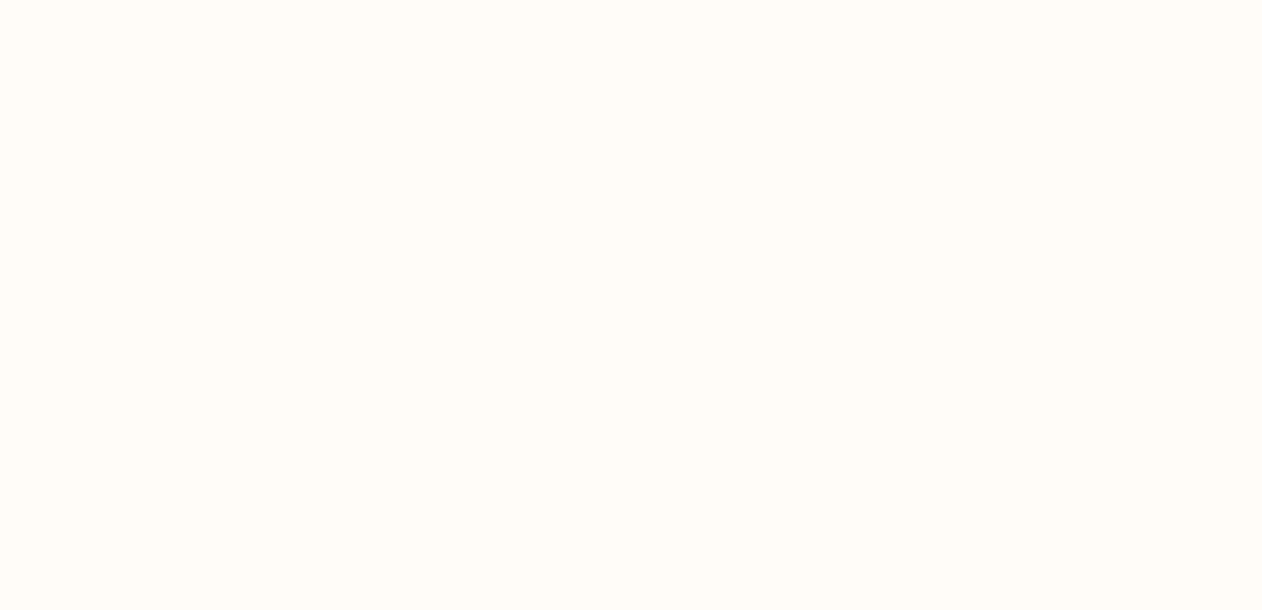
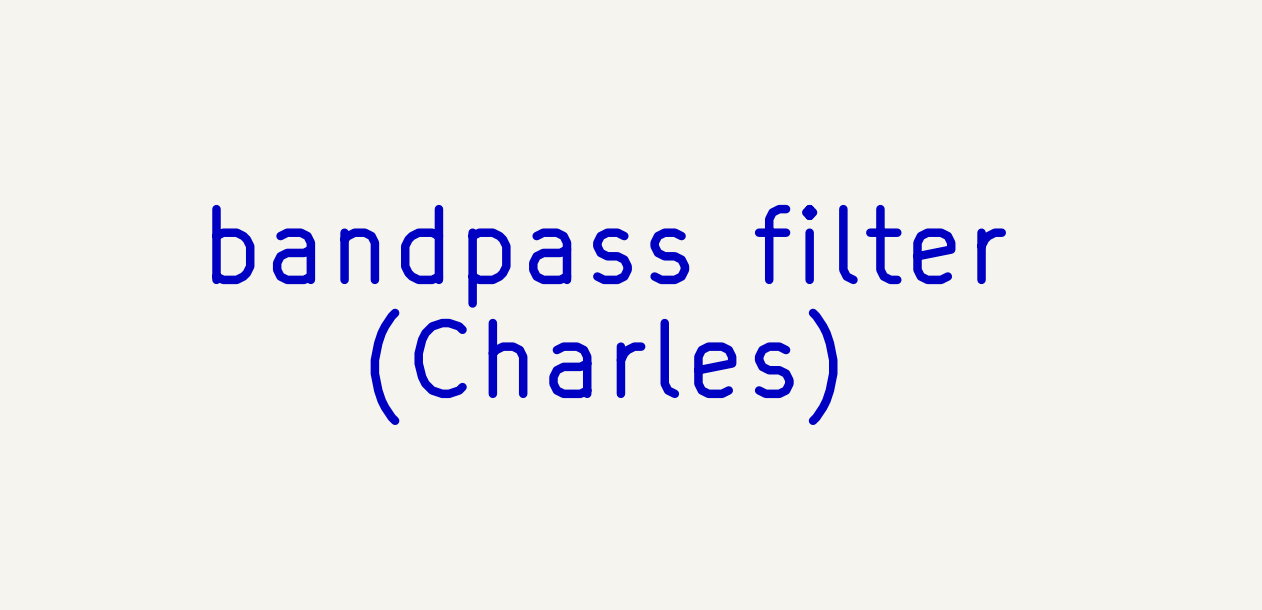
text: none -> bandpass filter (609, 256)
text: none -> (Charles) (604, 366)

